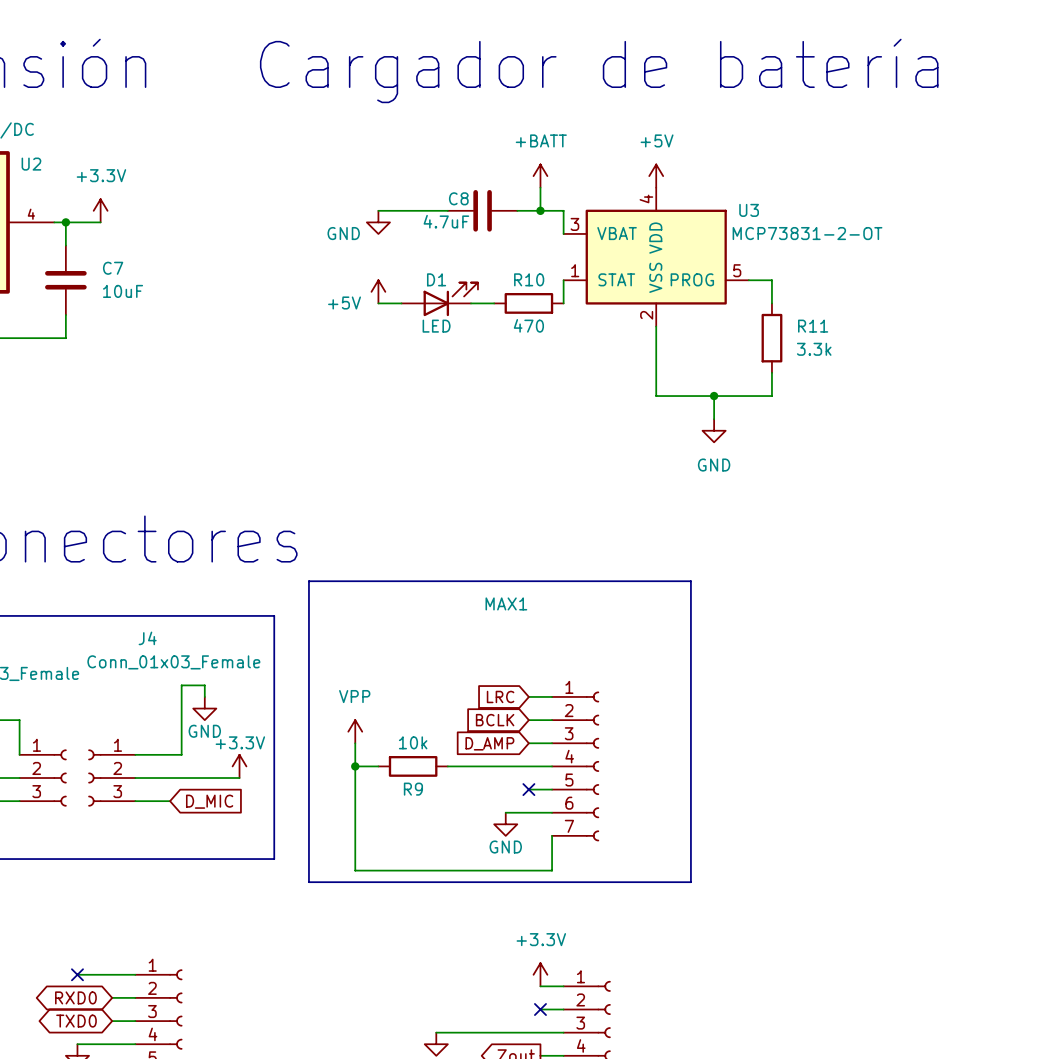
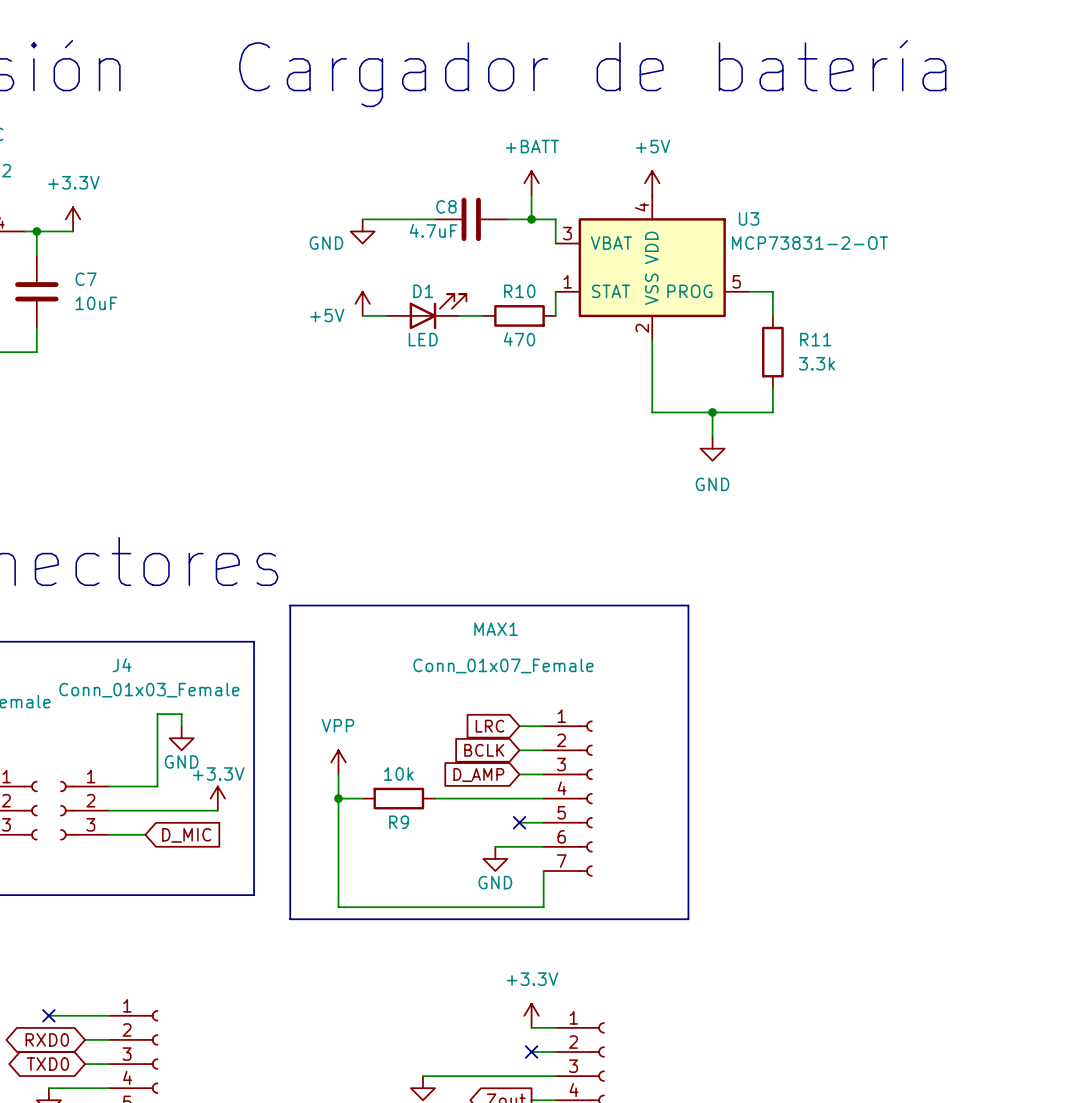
MAX1 value: none -> Conn_01x07_Female (503, 665)

